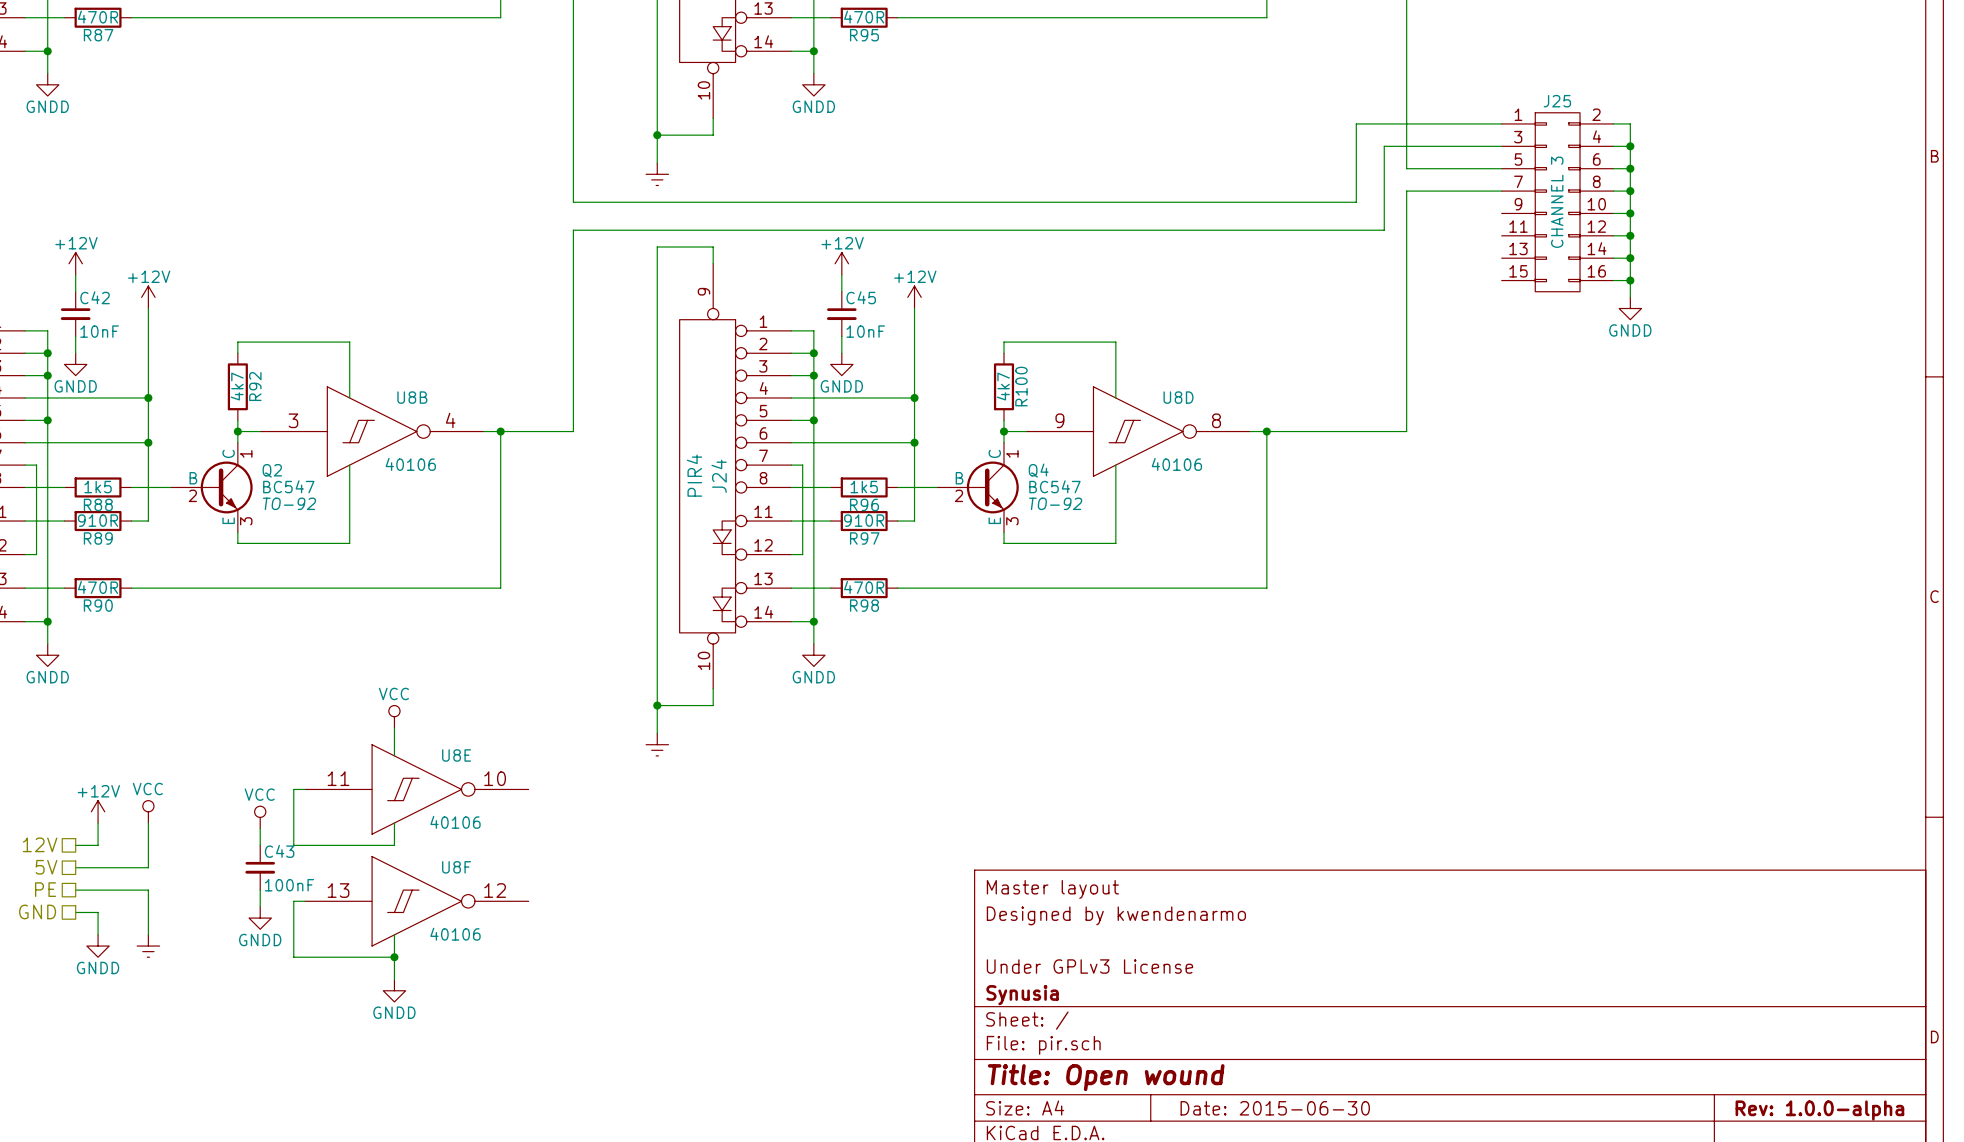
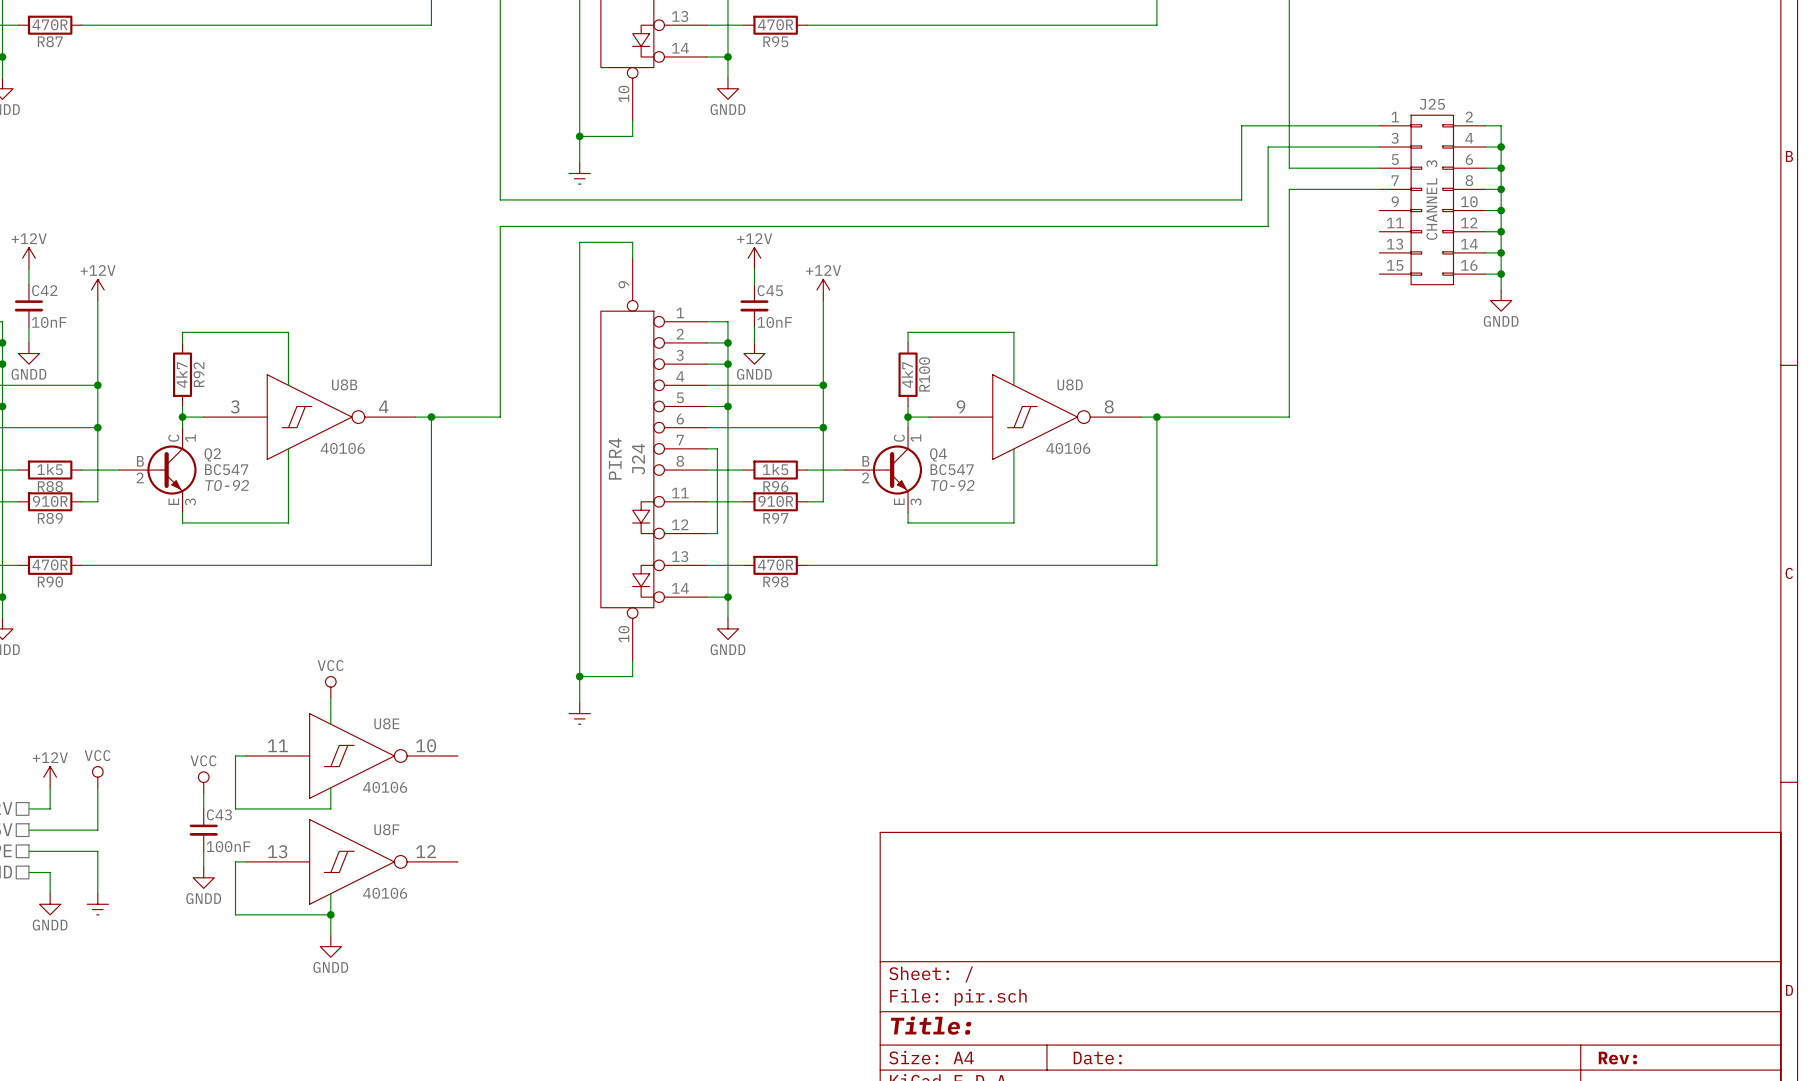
title block: Master layout (1052, 889) -> none
title block: Designed by kwendenarmo (1116, 915) -> none
title block: Under GPLv3 License (1089, 966) -> none
title block: Synusia (1022, 995) -> none
title block: Title: Open wound (1106, 1077) -> Title: (931, 1025)
title block: Date: 2015-06-30 (1275, 1108) -> Date: (1097, 1058)
title block: Rev: 1.0.0-alpha (1819, 1110) -> Rev: (1617, 1058)

